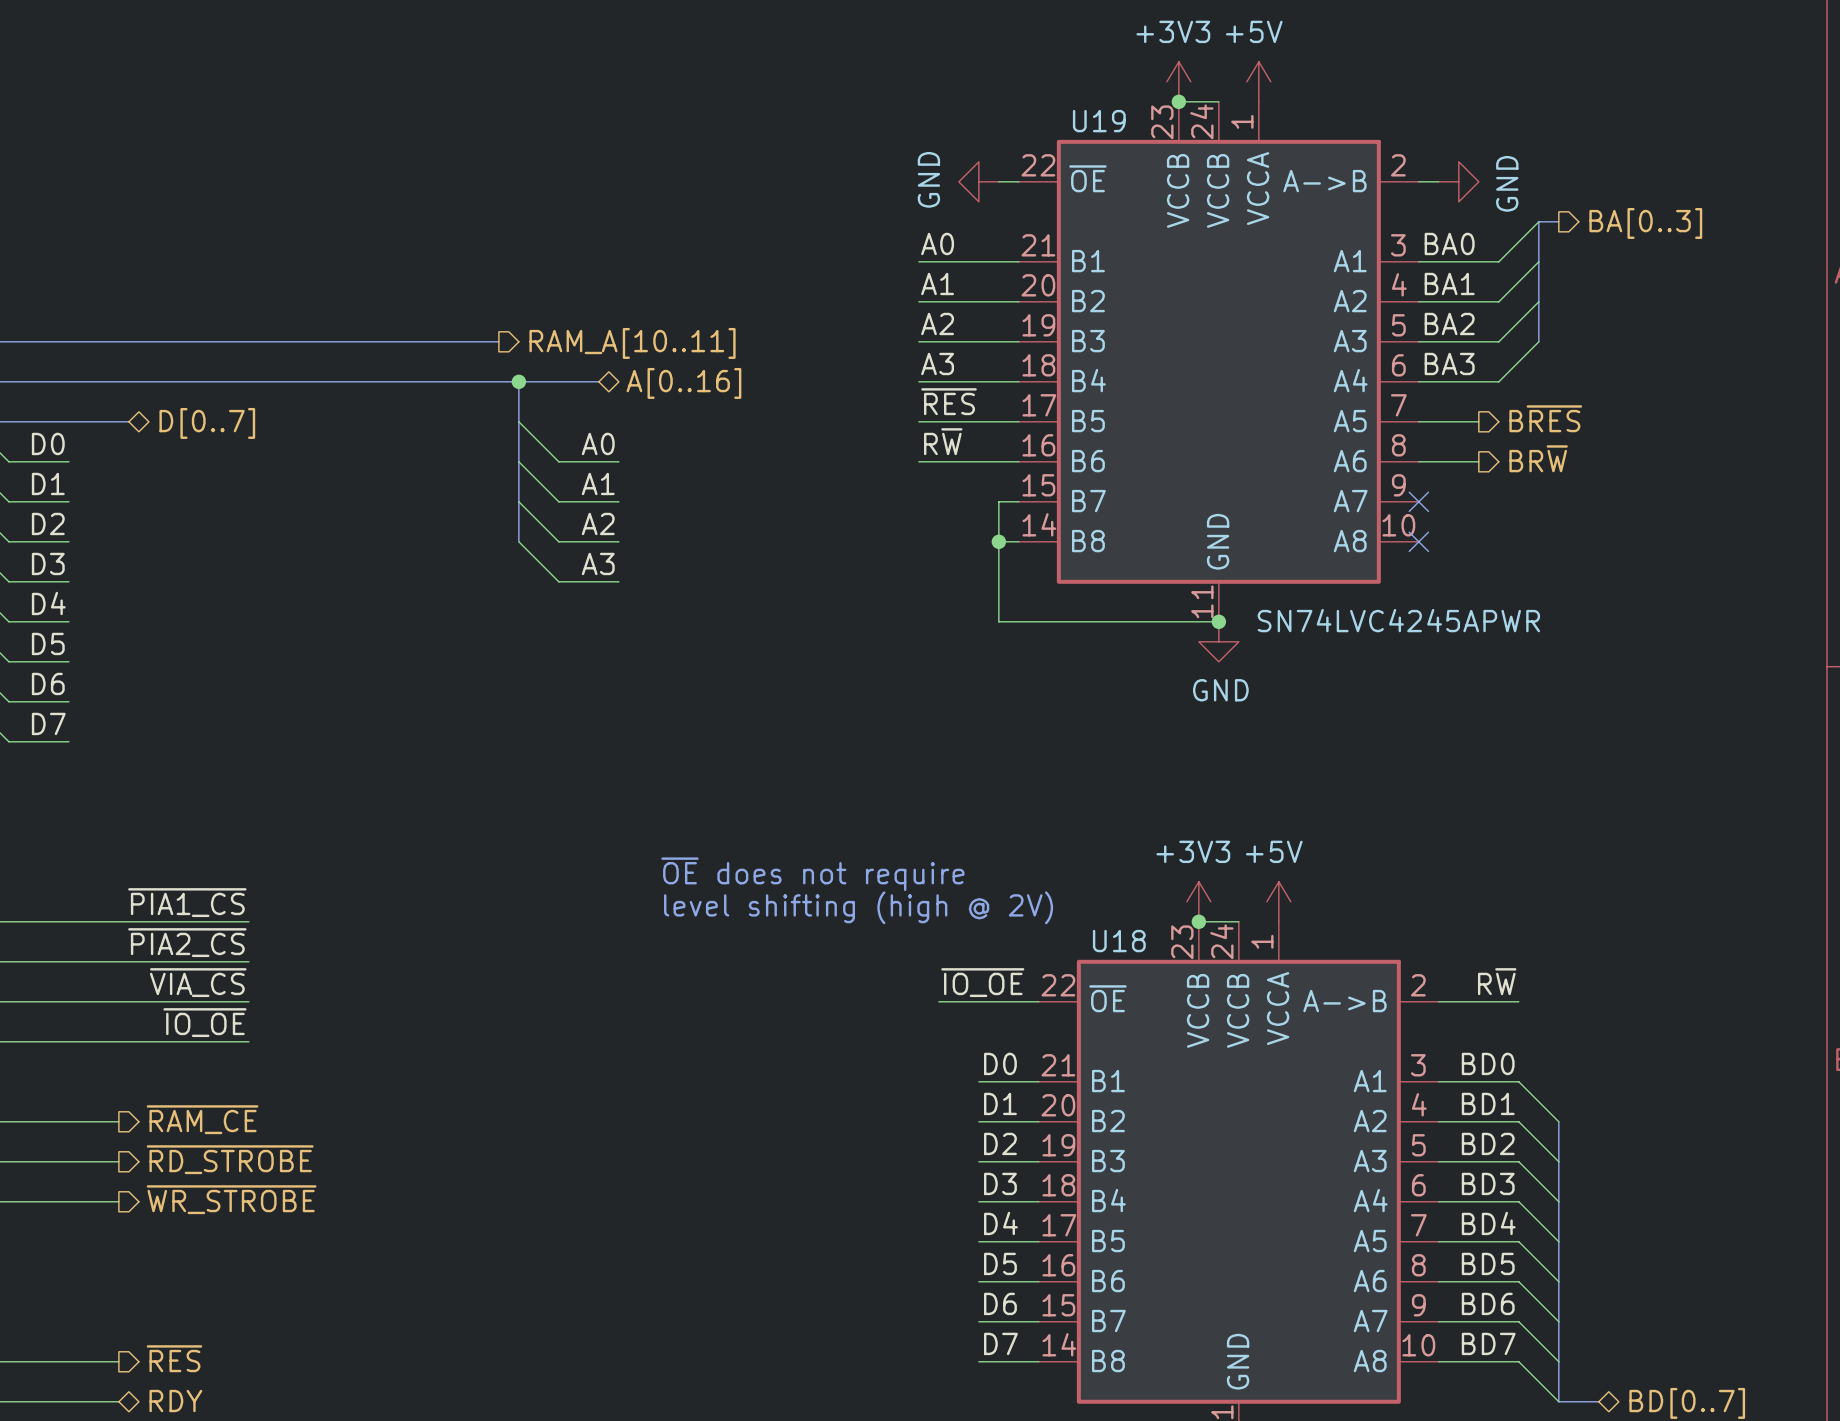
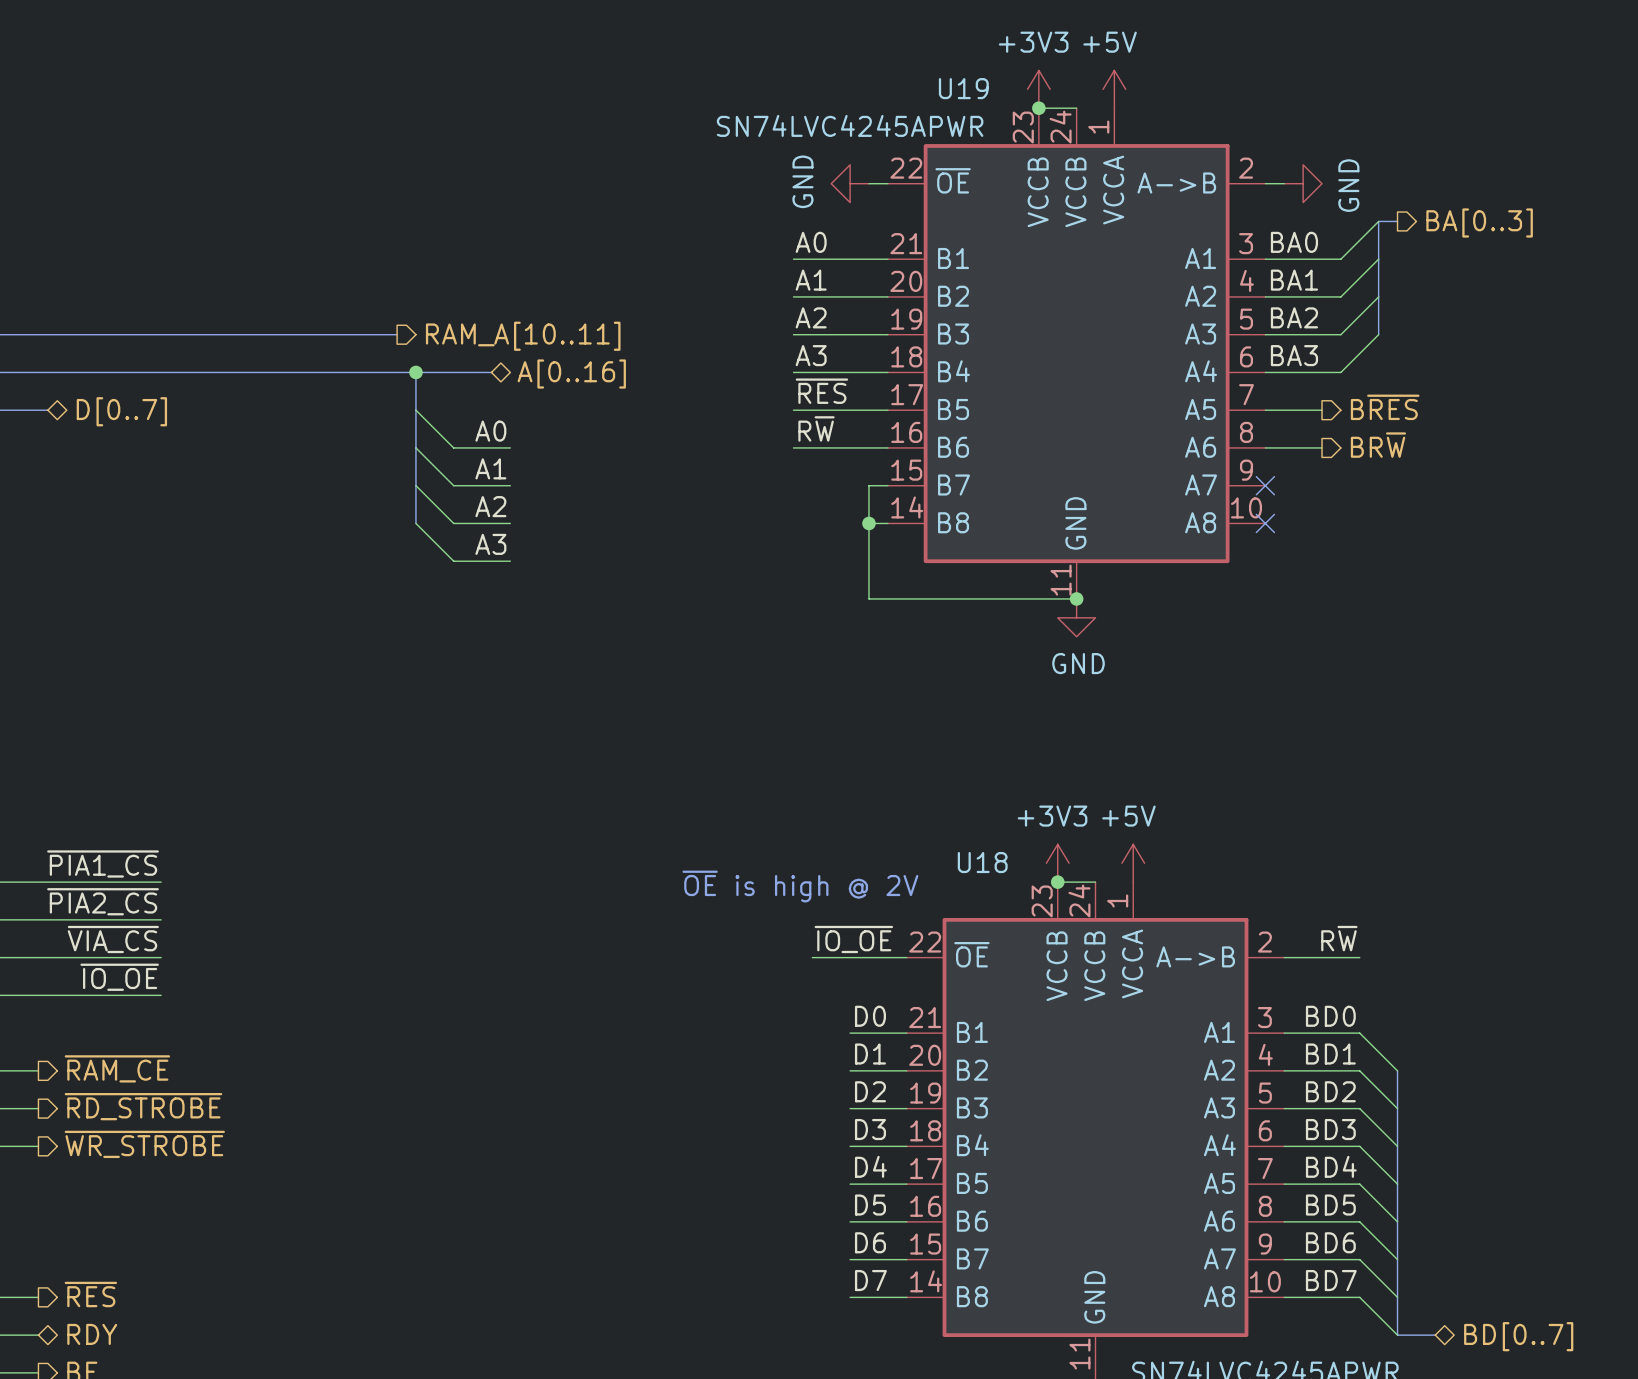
U19 name position: U19 (1099, 121) -> U19 (963, 88)
U19 value position: SN74LVC4245APWR (1398, 620) -> SN74LVC4245APWR (850, 125)
text: ~{OE} does not require (812, 874) -> none
text: level shifting (high @ 2V) (858, 907) -> none
text: none -> ~{OE} is high @ 2V (800, 886)
U18 name position: U18 (1119, 941) -> U18 (982, 862)

